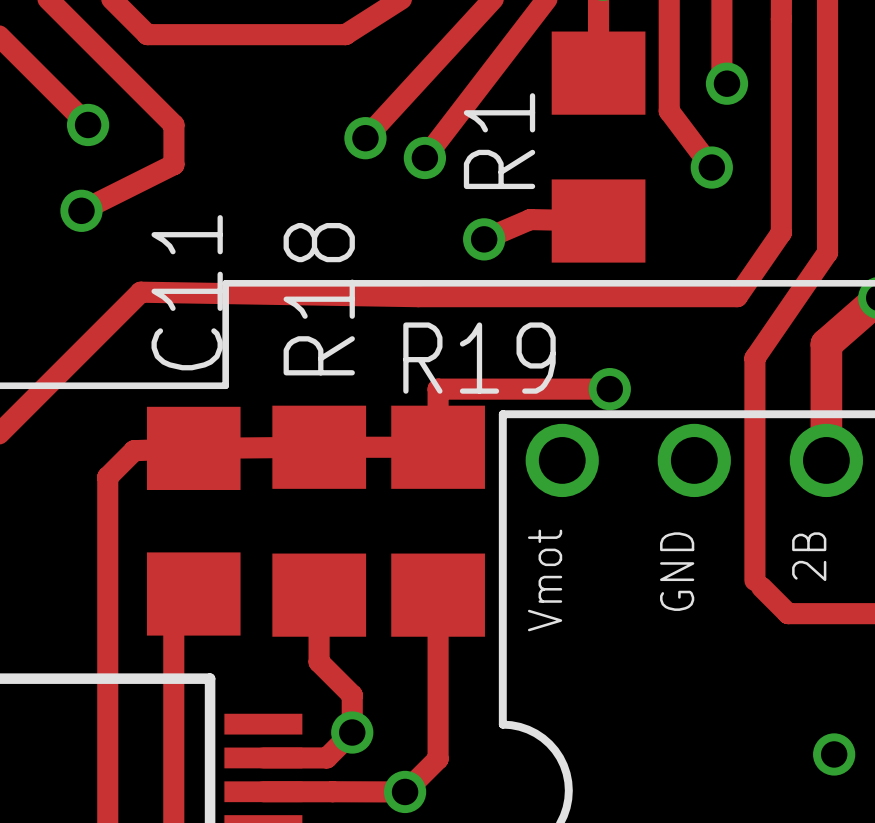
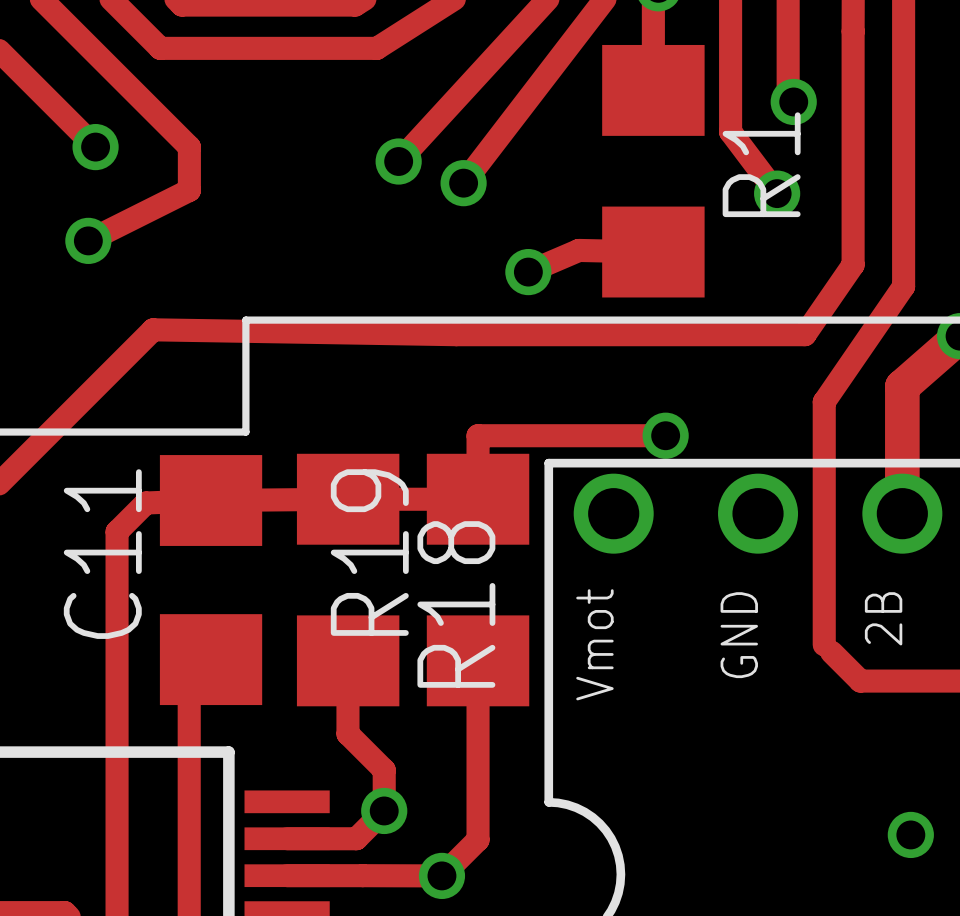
R1 name position: R1 (499, 141) -> R1 (761, 164)
C11 name position: C11 (187, 292) -> C11 (102, 554)
R18 name position: R18 (319, 299) -> R18 (456, 604)
R19 name rotation: 0° (479, 358) -> 90° counterclockwise (369, 552)

